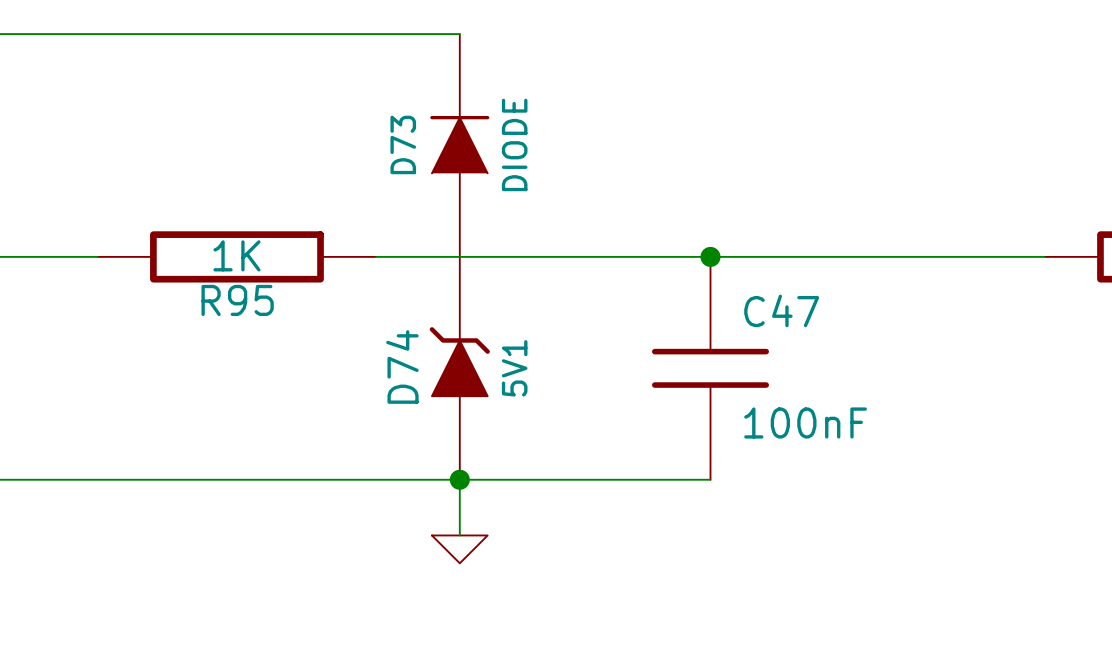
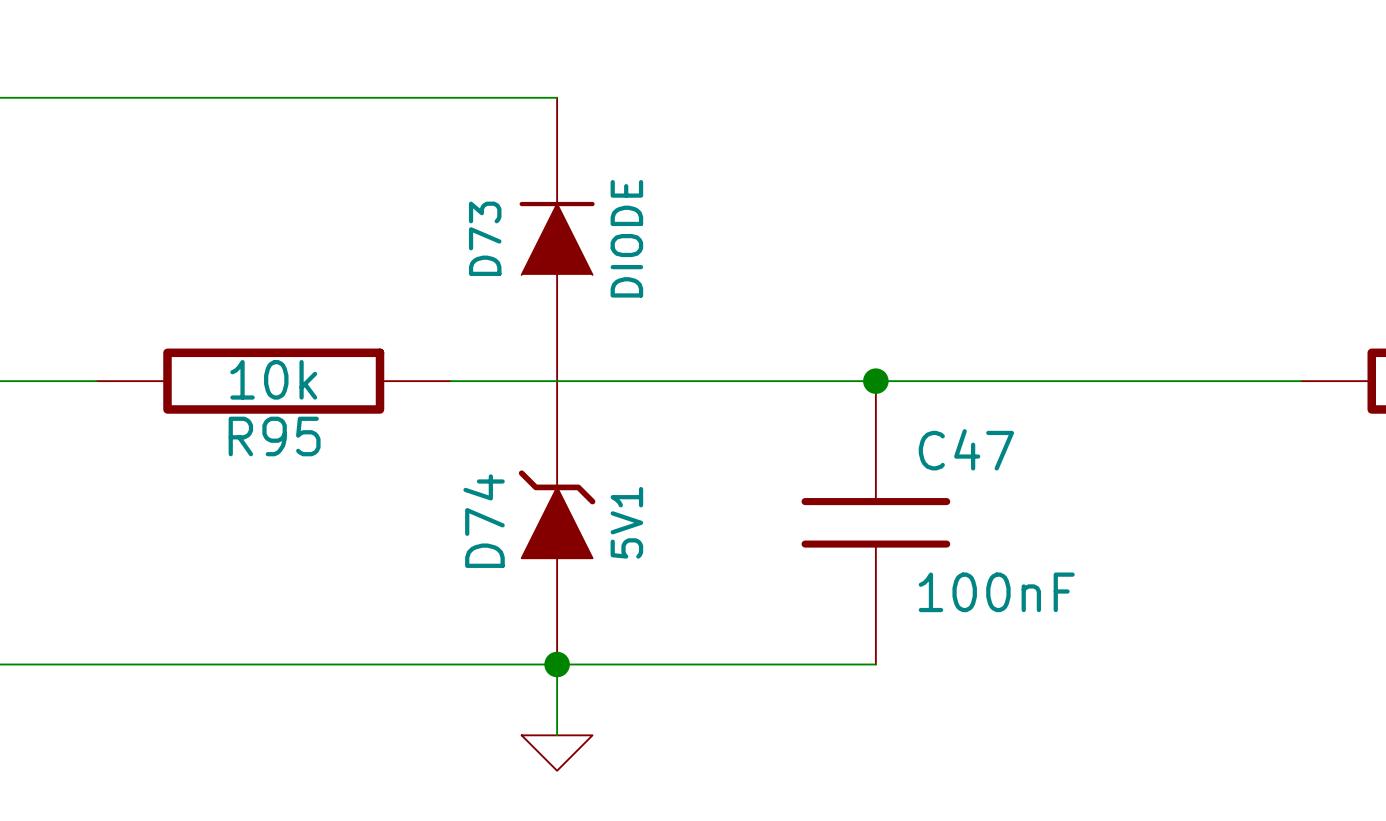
R95 value: 1K (236, 255) -> 10k (273, 379)

